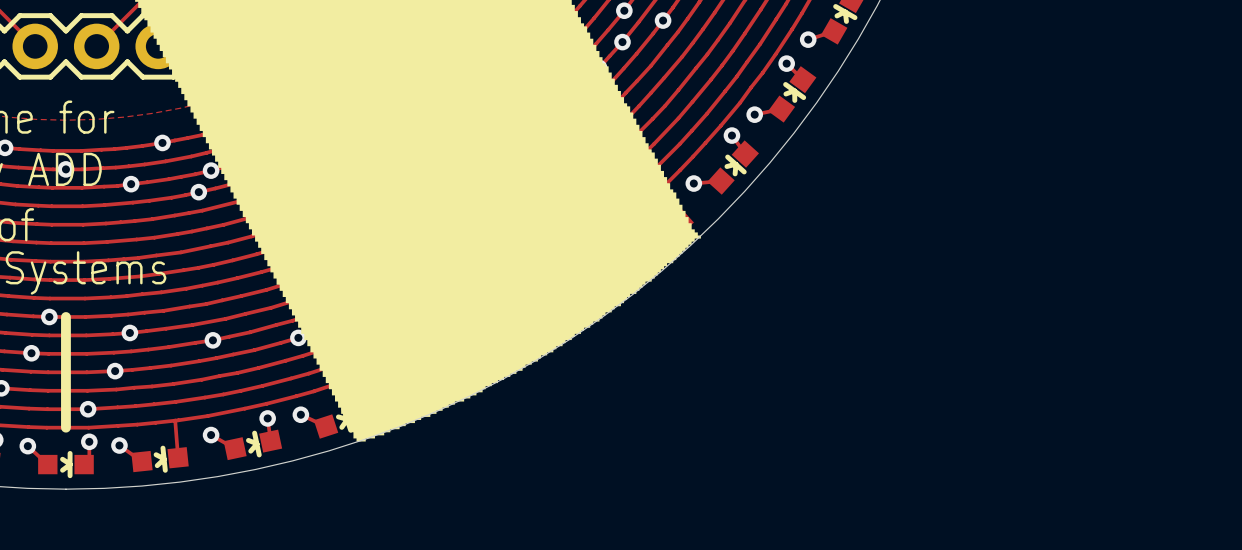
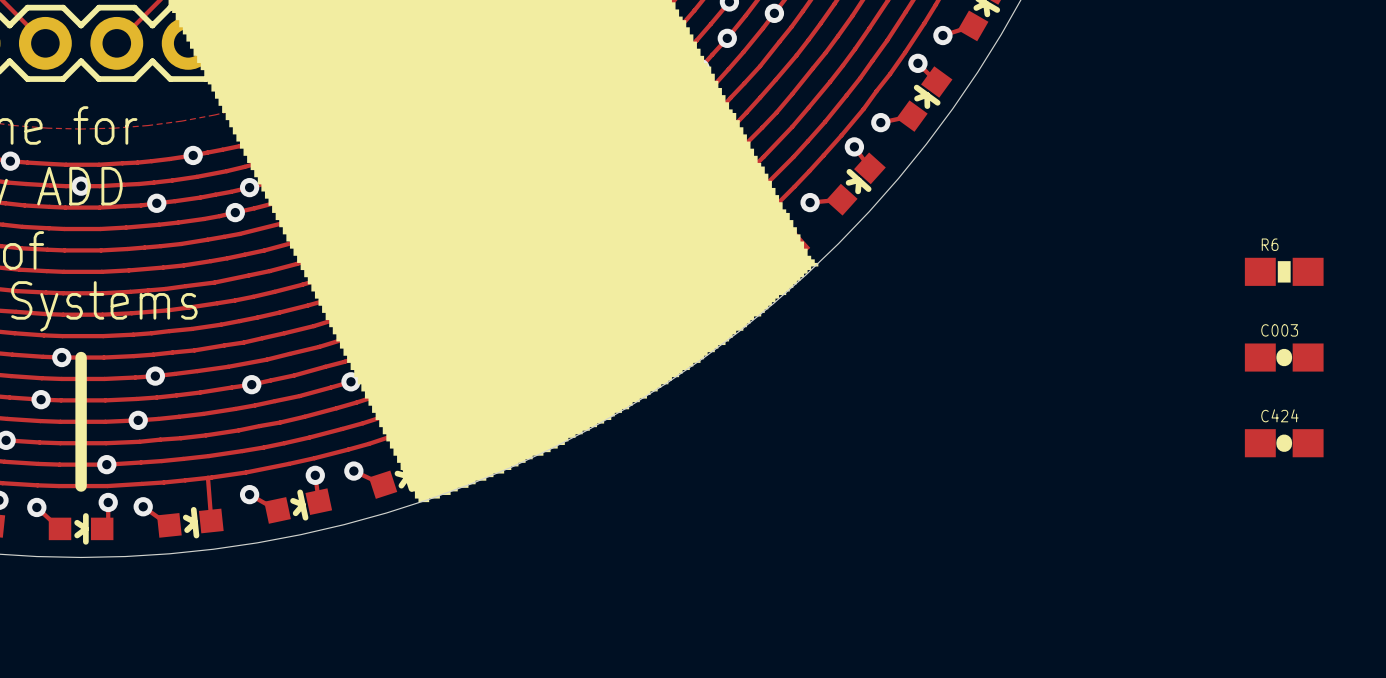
R6: none -> (1284, 271)
C003: none -> (1284, 357)
C424: none -> (1284, 443)

